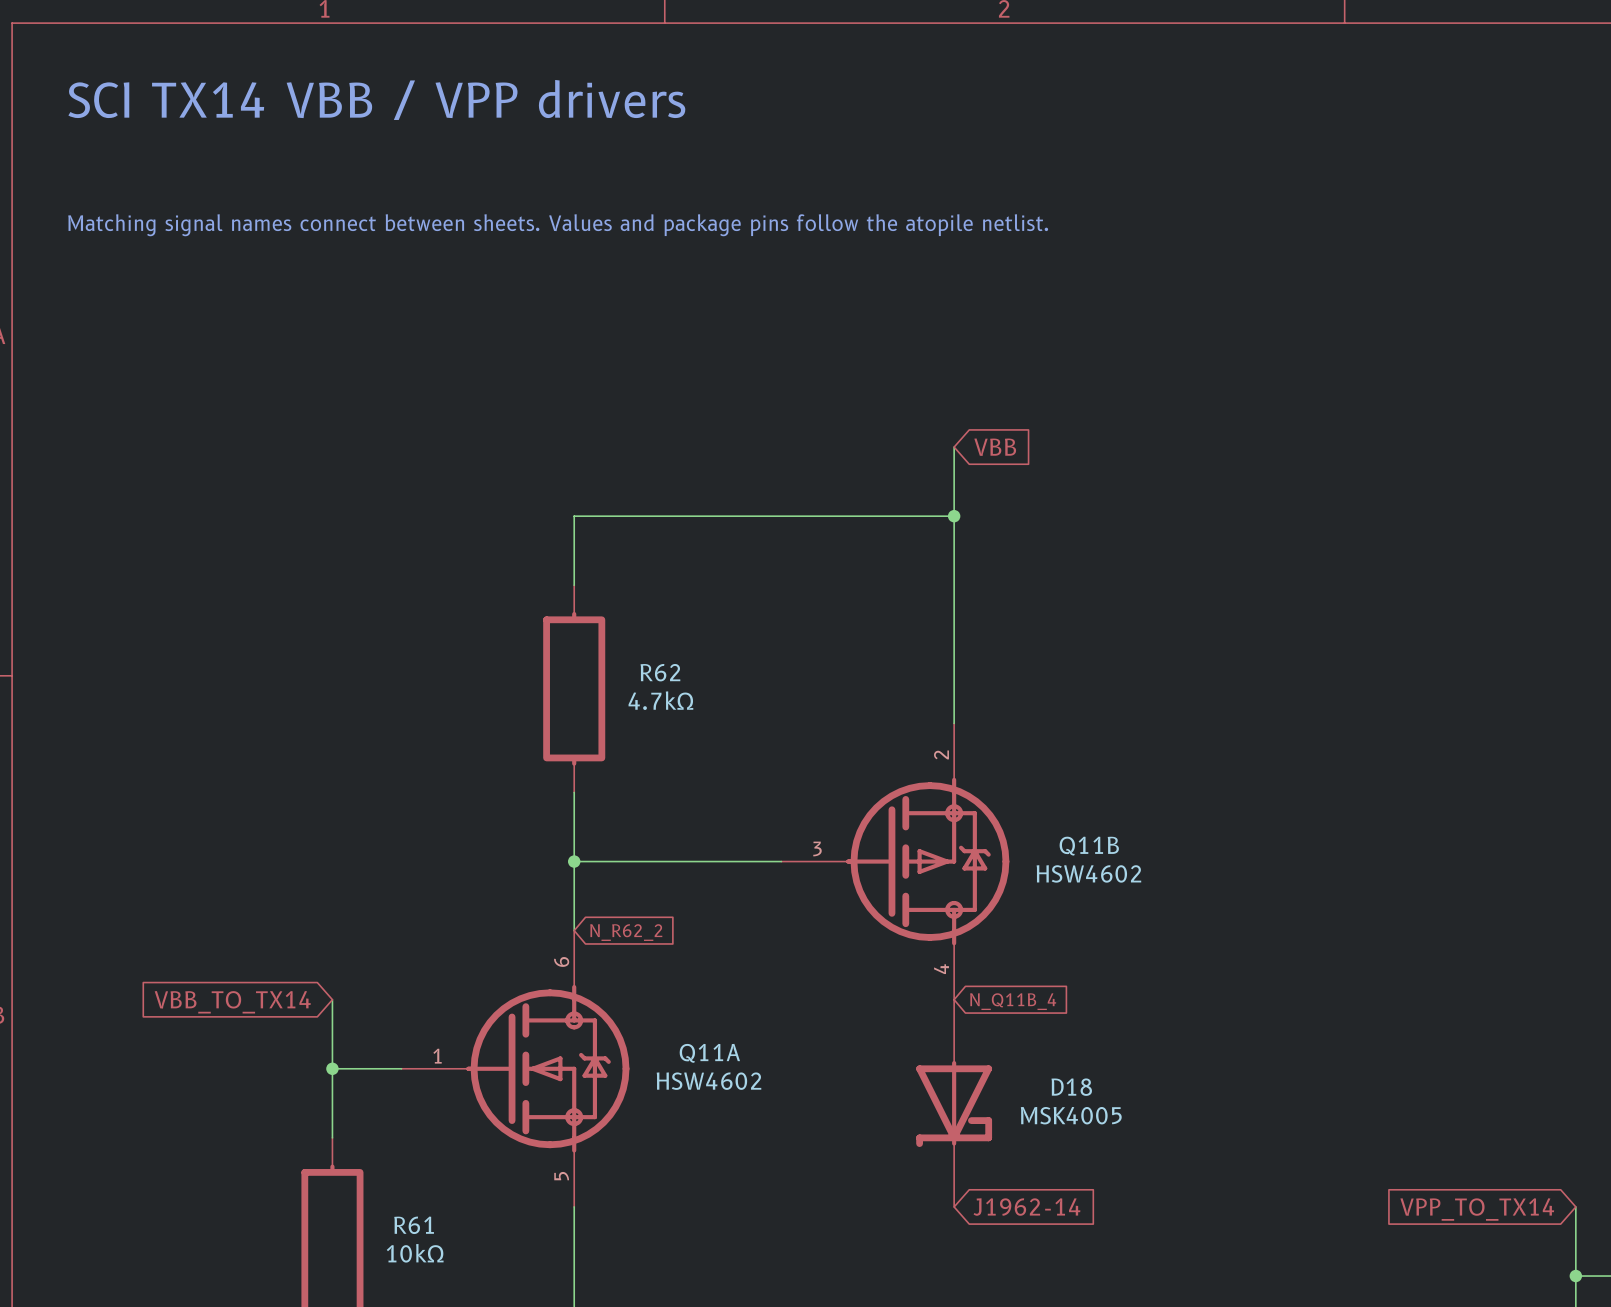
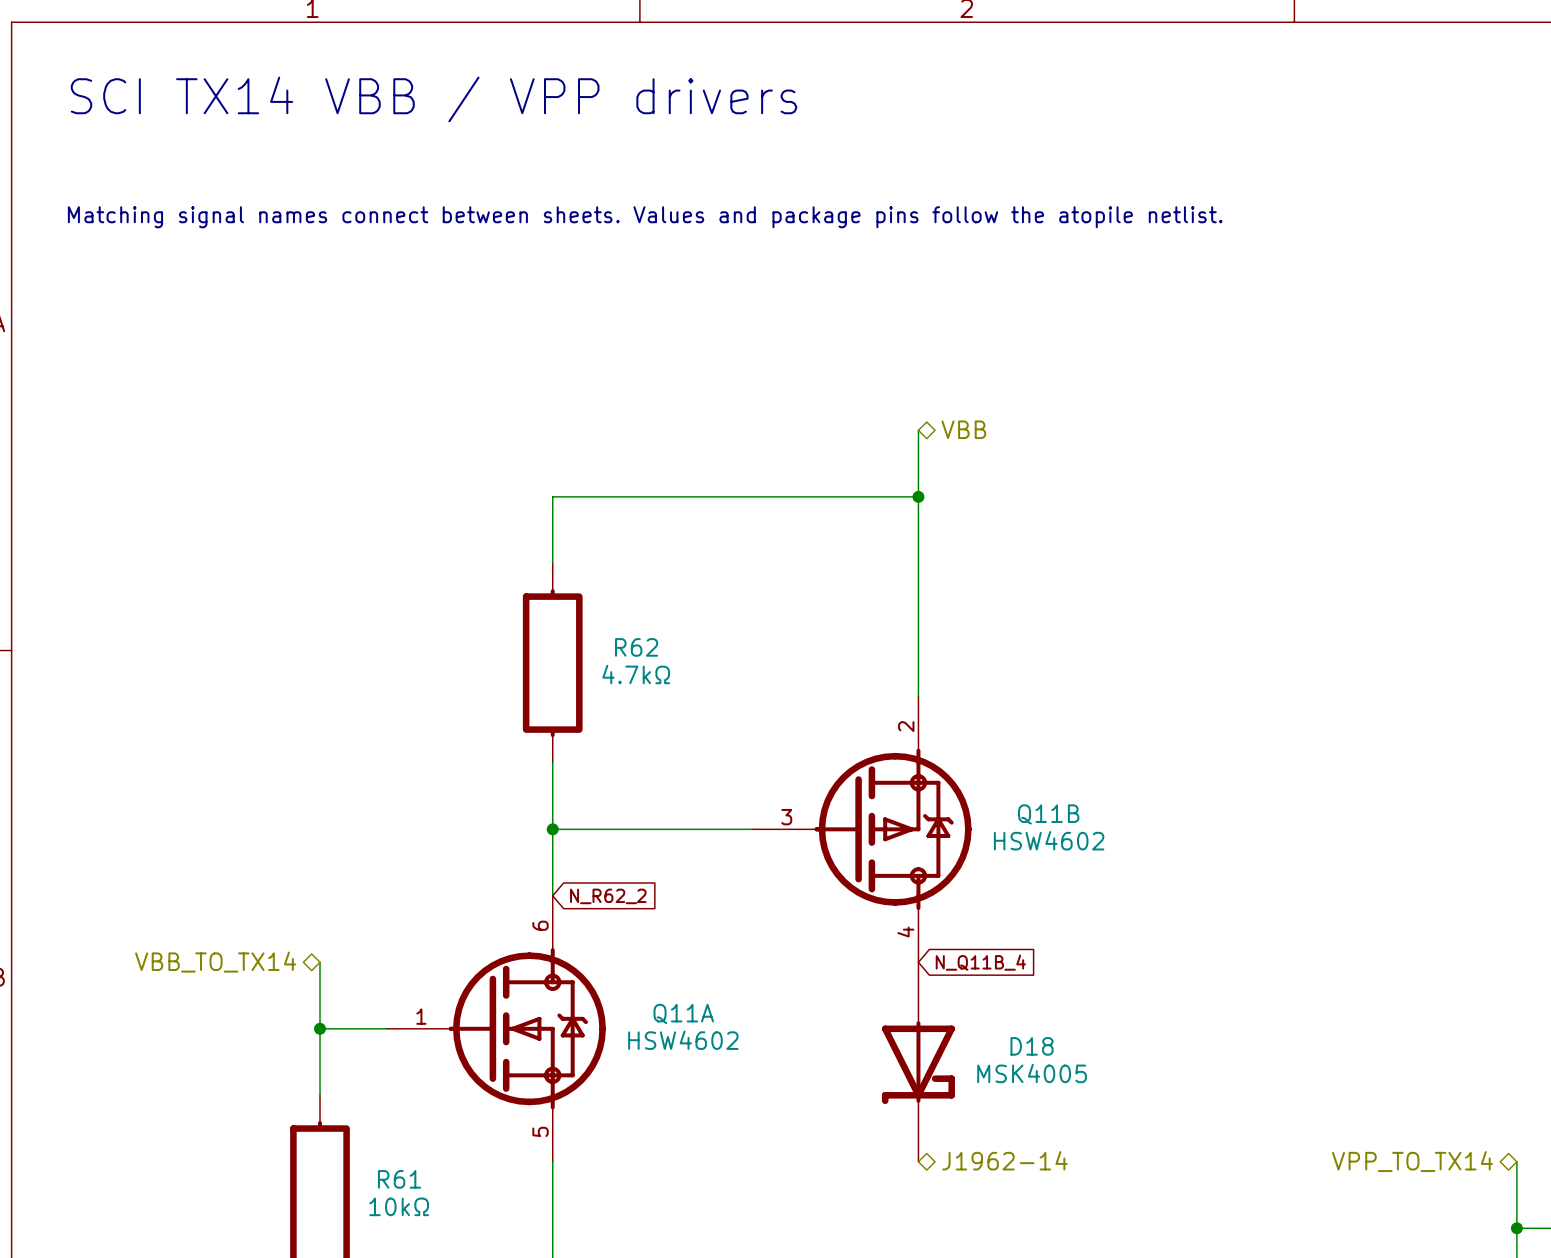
hierarchical label: none -> VBB (963, 429)
global label: VBB (995, 447) -> none
hierarchical label: none -> VBB_TO_TX14 (215, 962)
global label: VBB_TO_TX14 (232, 1002) -> none
hierarchical label: none -> J1962-14 (1004, 1160)
global label: J1962-14 (1026, 1207) -> none
hierarchical label: none -> VPP_TO_TX14 (1412, 1161)
global label: VPP_TO_TX14 (1477, 1209) -> none

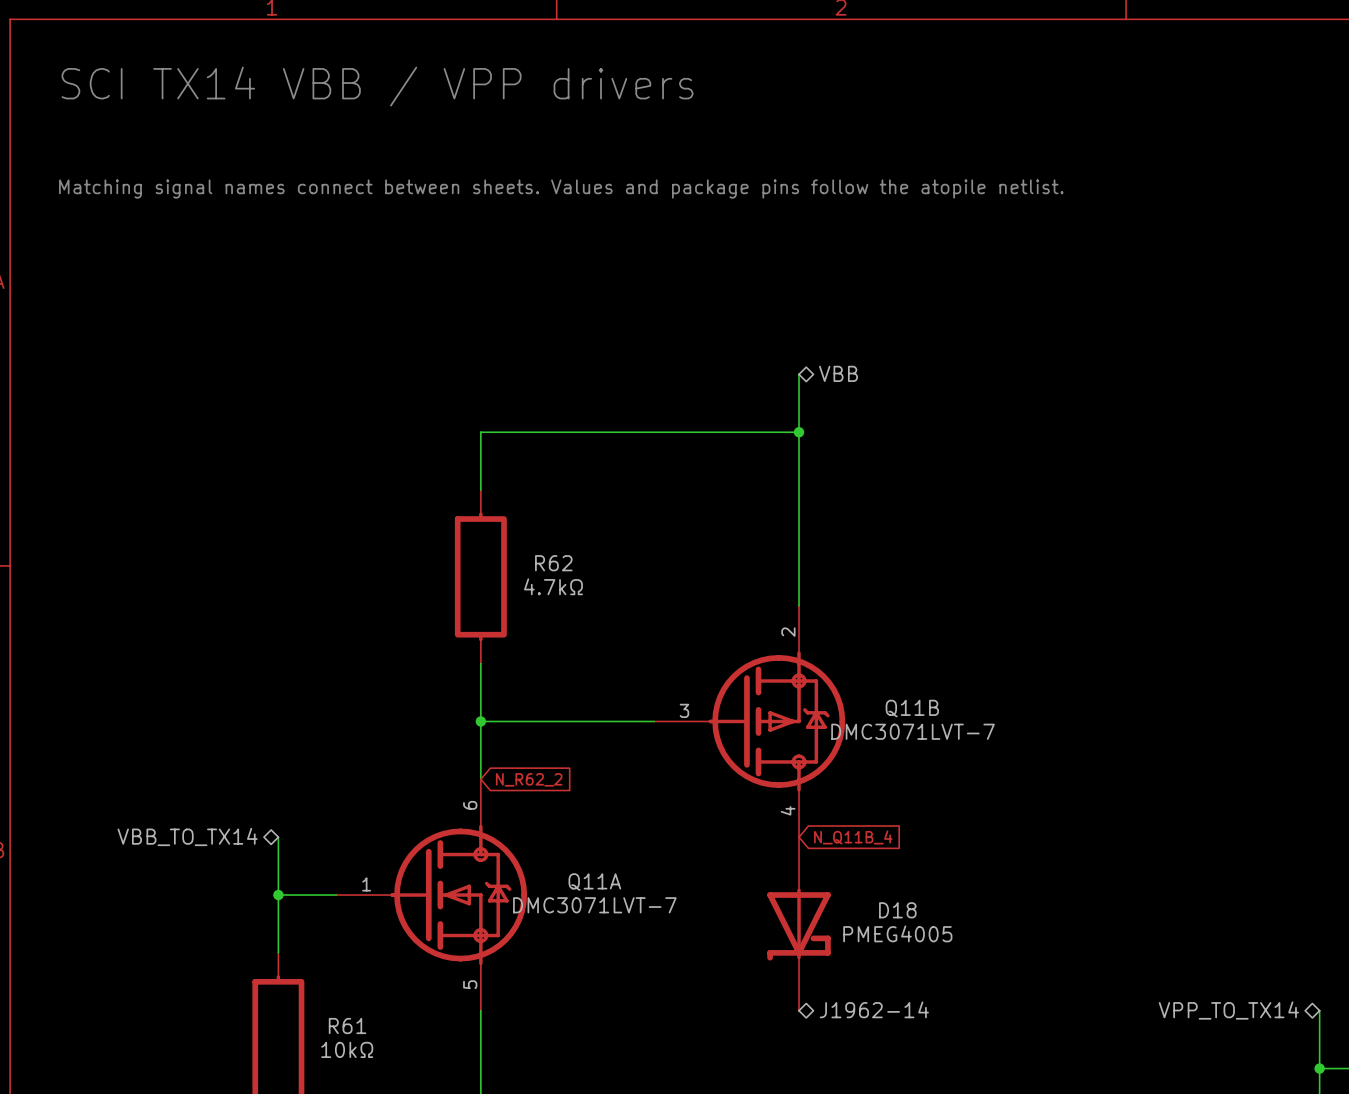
Q11B value: HSW4602 (1049, 840) -> DMC3071LVT-7 (913, 731)
Q11A value: HSW4602 (683, 1040) -> DMC3071LVT-7 (594, 905)
D18 value: MSK4005 (1032, 1073) -> PMEG4005 (897, 933)

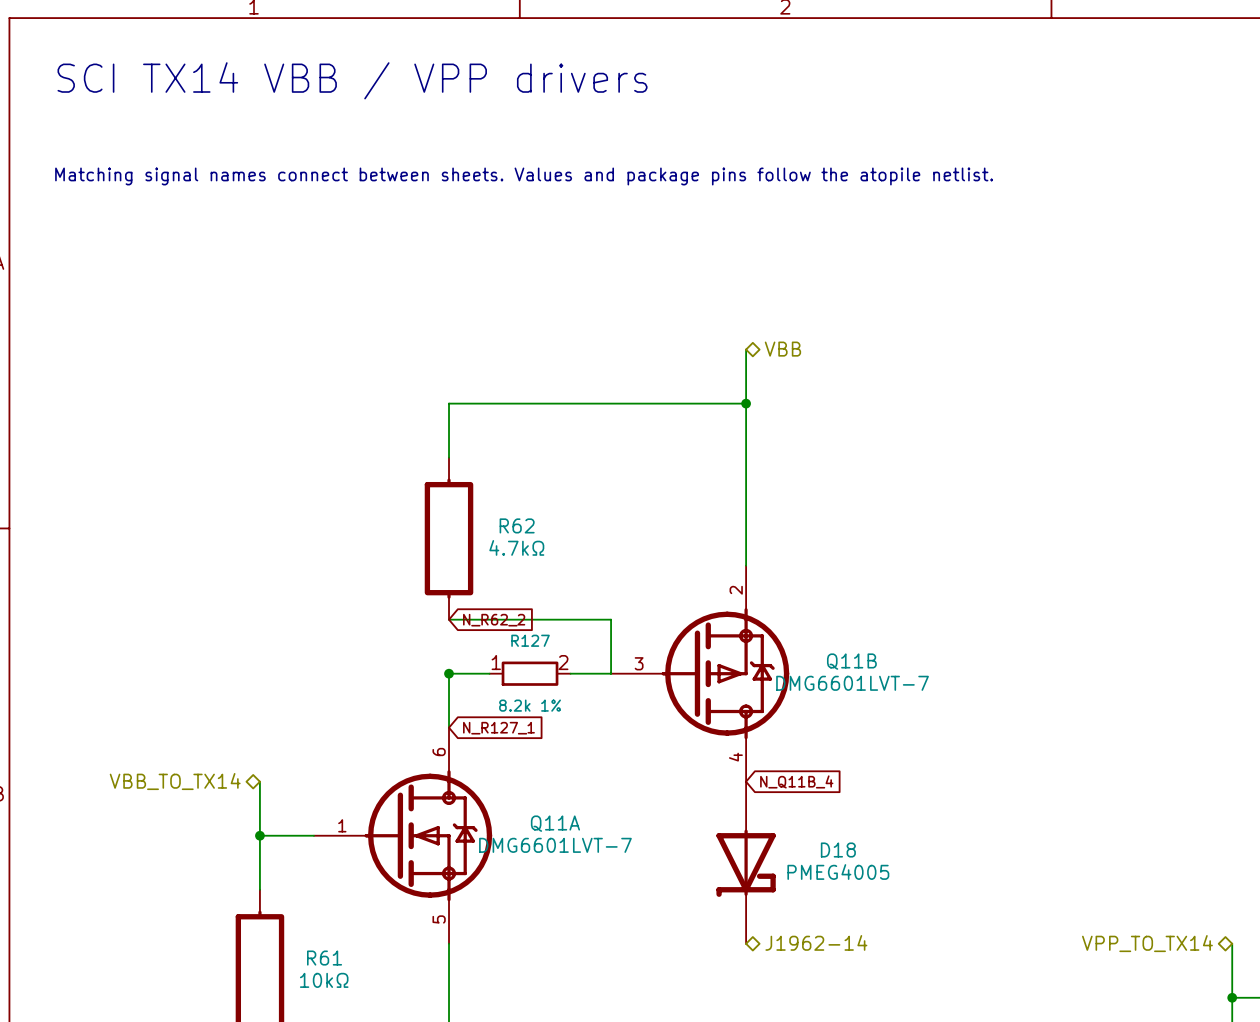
wire: (480, 663) (480, 721) -> (449, 619) (611, 619) (611, 673)
global label: none -> N_R62_2 (494, 620)
wire: (524, 721) (611, 721) -> none
R127: none -> 8.2k 1% (530, 673)
Q11B value: DMC3071LVT-7 (913, 731) -> DMG6601LVT-7 (852, 683)
global label: N_R62_2 (529, 779) -> N_R127_1 (498, 728)
Q11A value: DMC3071LVT-7 (594, 905) -> DMG6601LVT-7 (555, 845)

